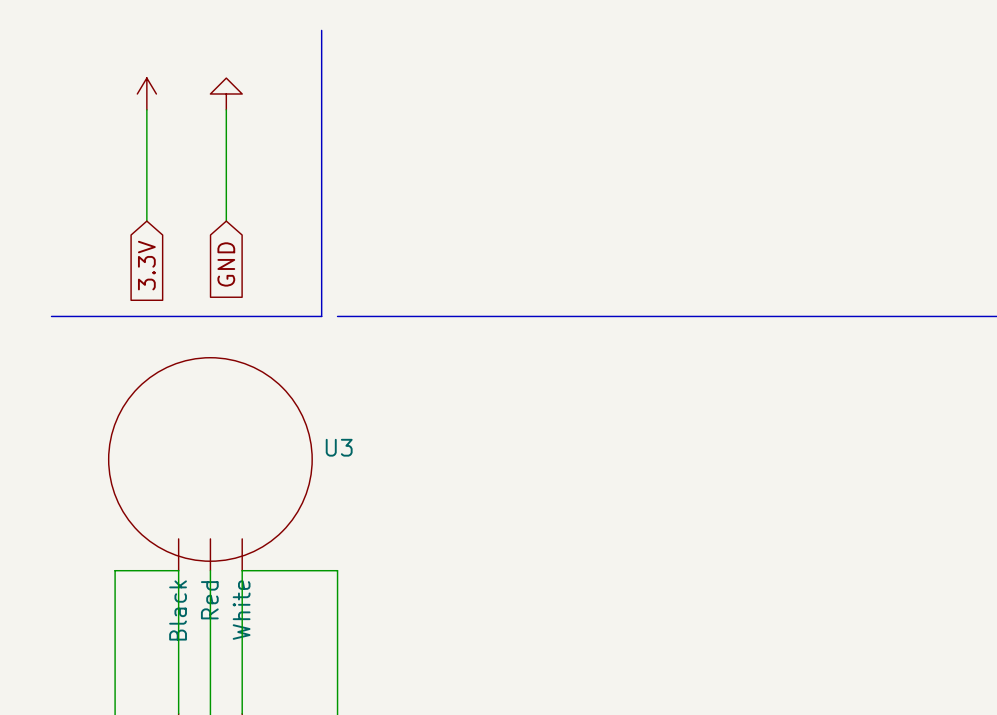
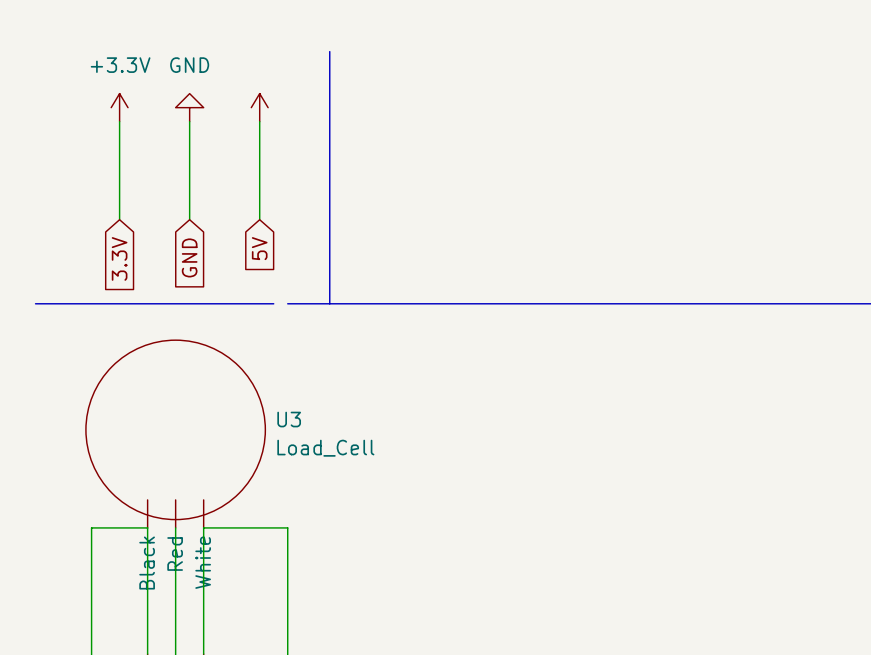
line: (321, 30) (321, 316) -> (329, 51) (329, 303)
power symbol text: none -> +3.3V (120, 65)
power symbol text: none -> GND (189, 65)
power symbol: none -> (259, 107)
wire: none -> (259, 121) (259, 219)
global label: none -> 5V (259, 248)
U3 value: none -> Load_Cell (325, 448)

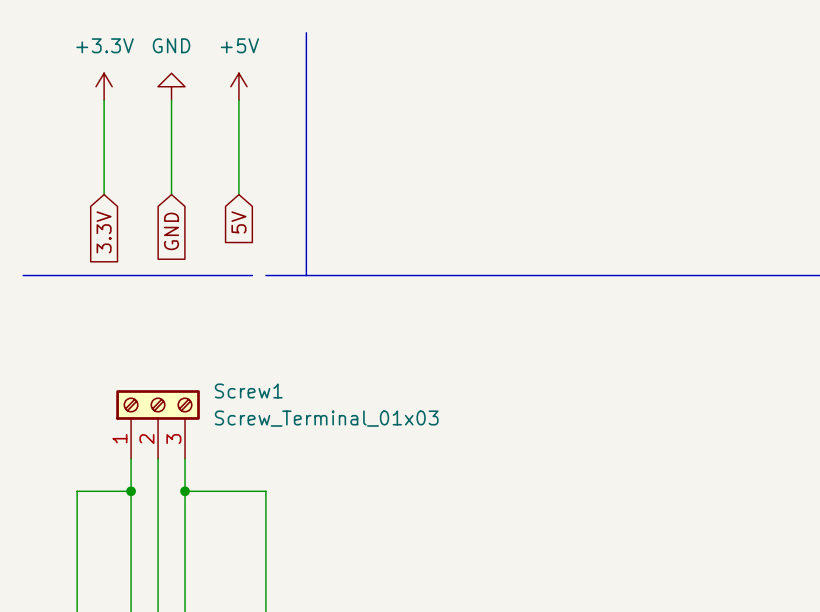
power symbol text: none -> +5V (239, 45)
U3: Load_Cell (175, 434) -> none
Screw1: none -> Screw_Terminal_01x03 (158, 424)
junction: none -> (131, 491)
junction: none -> (185, 491)

